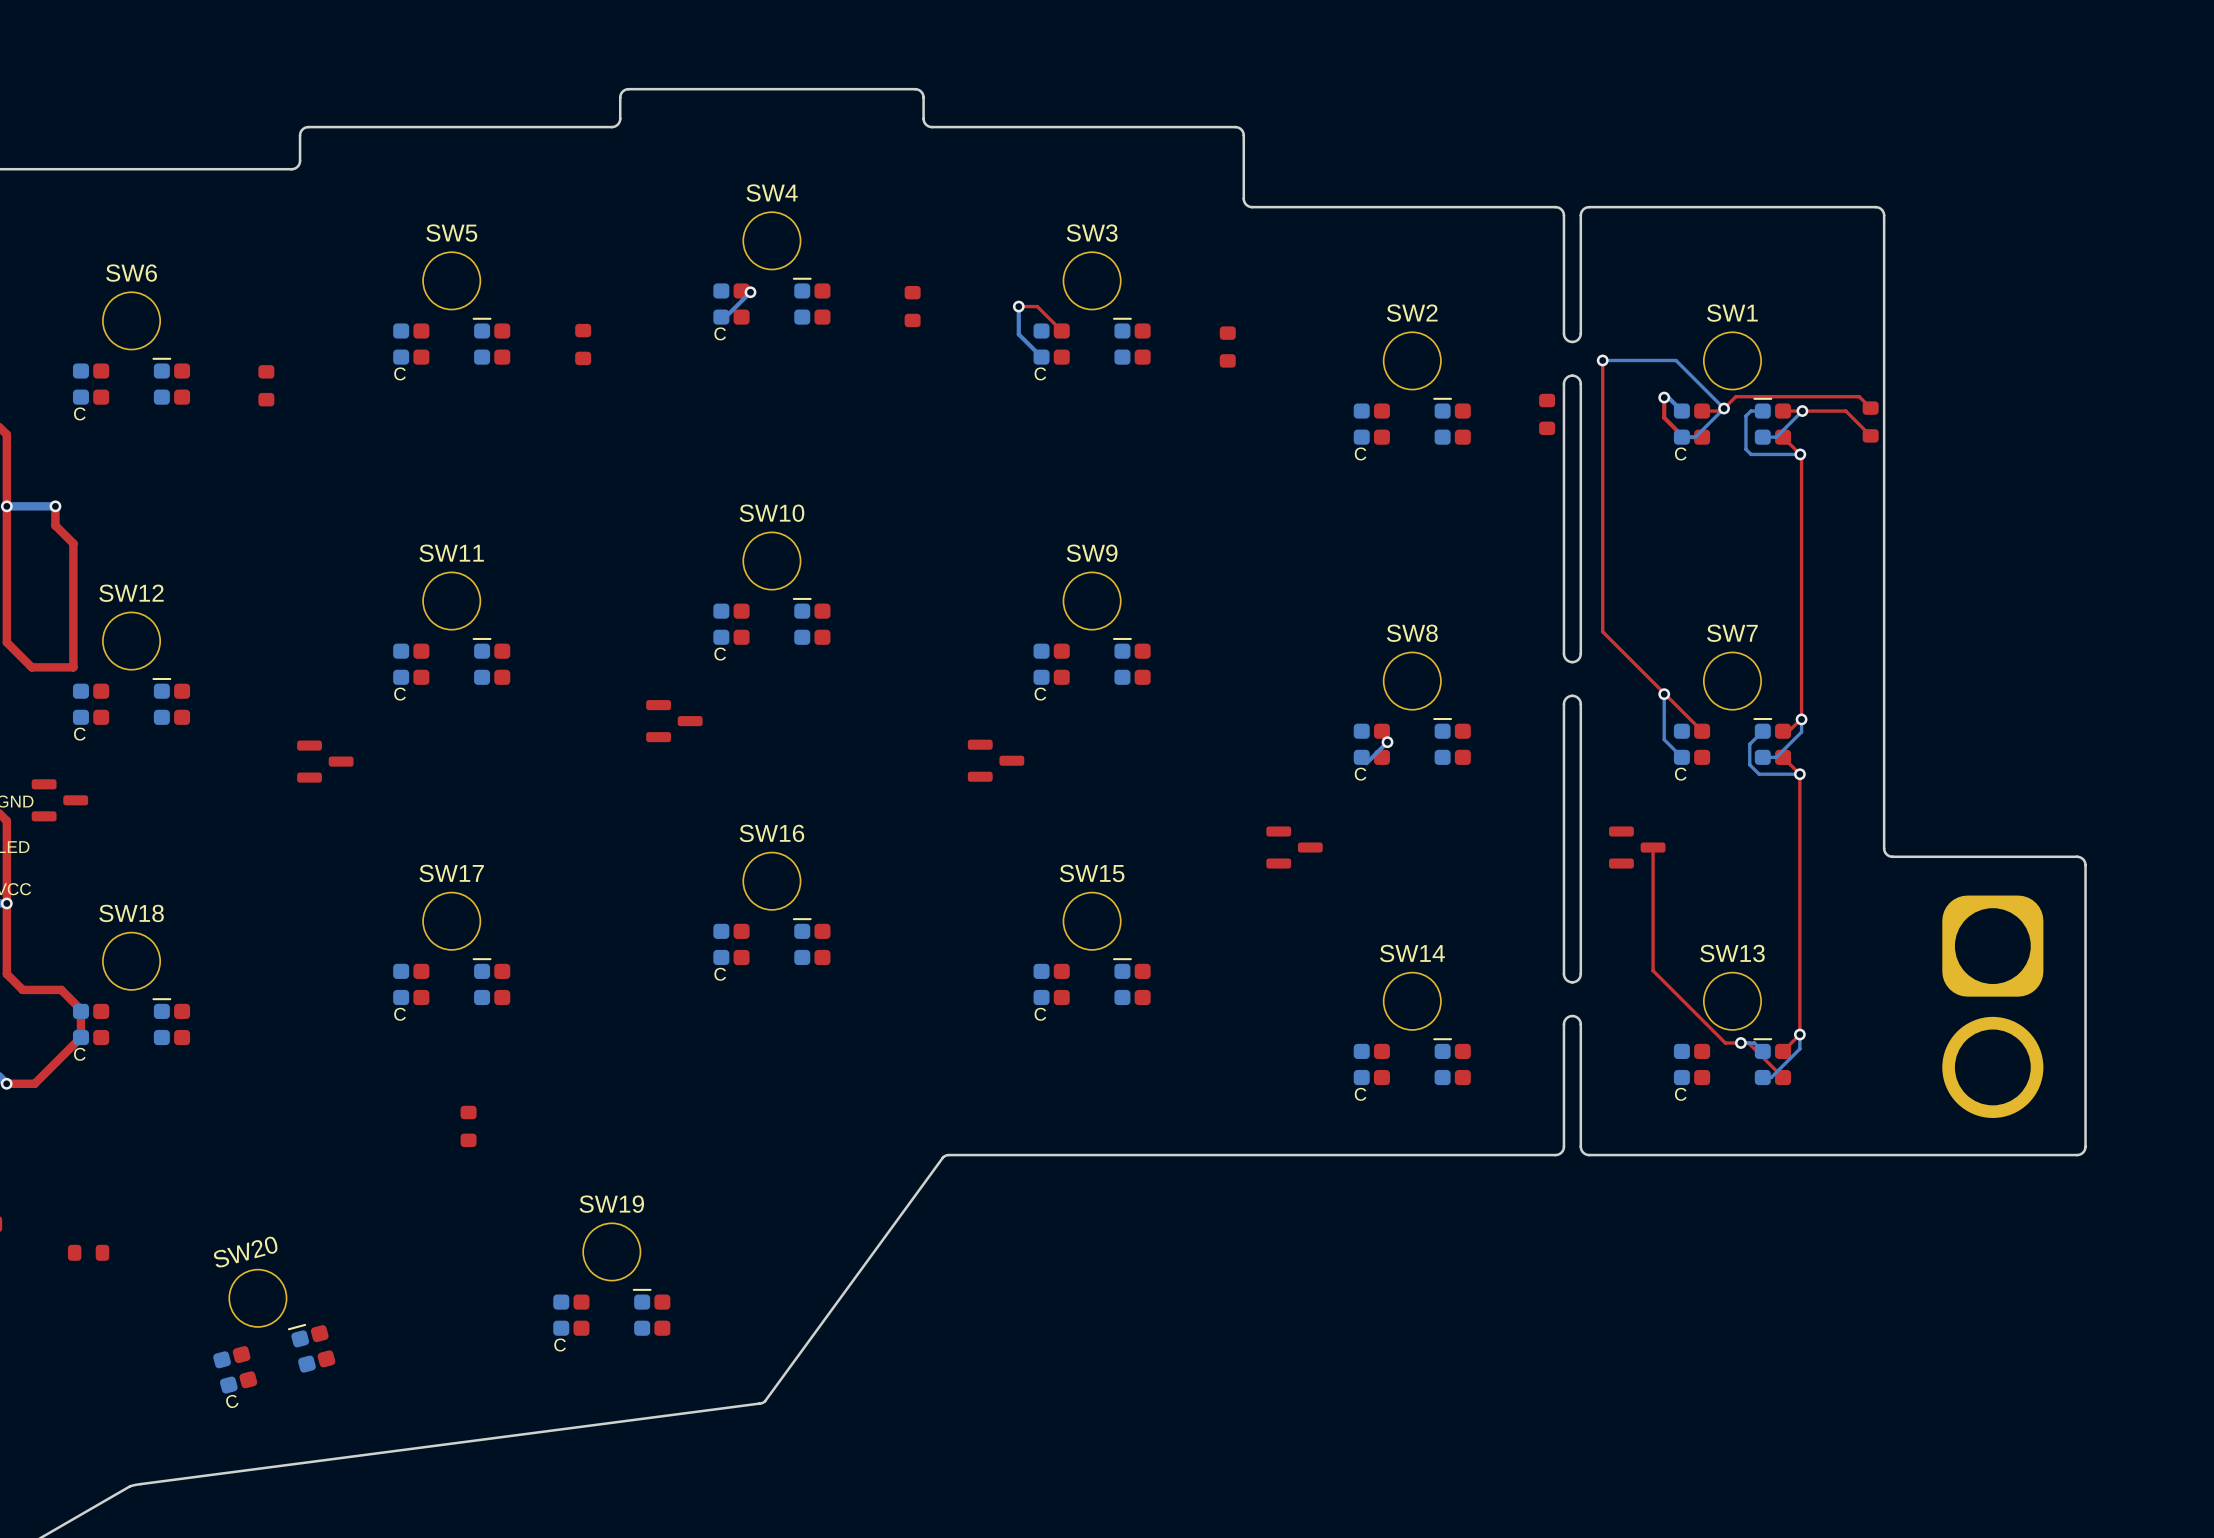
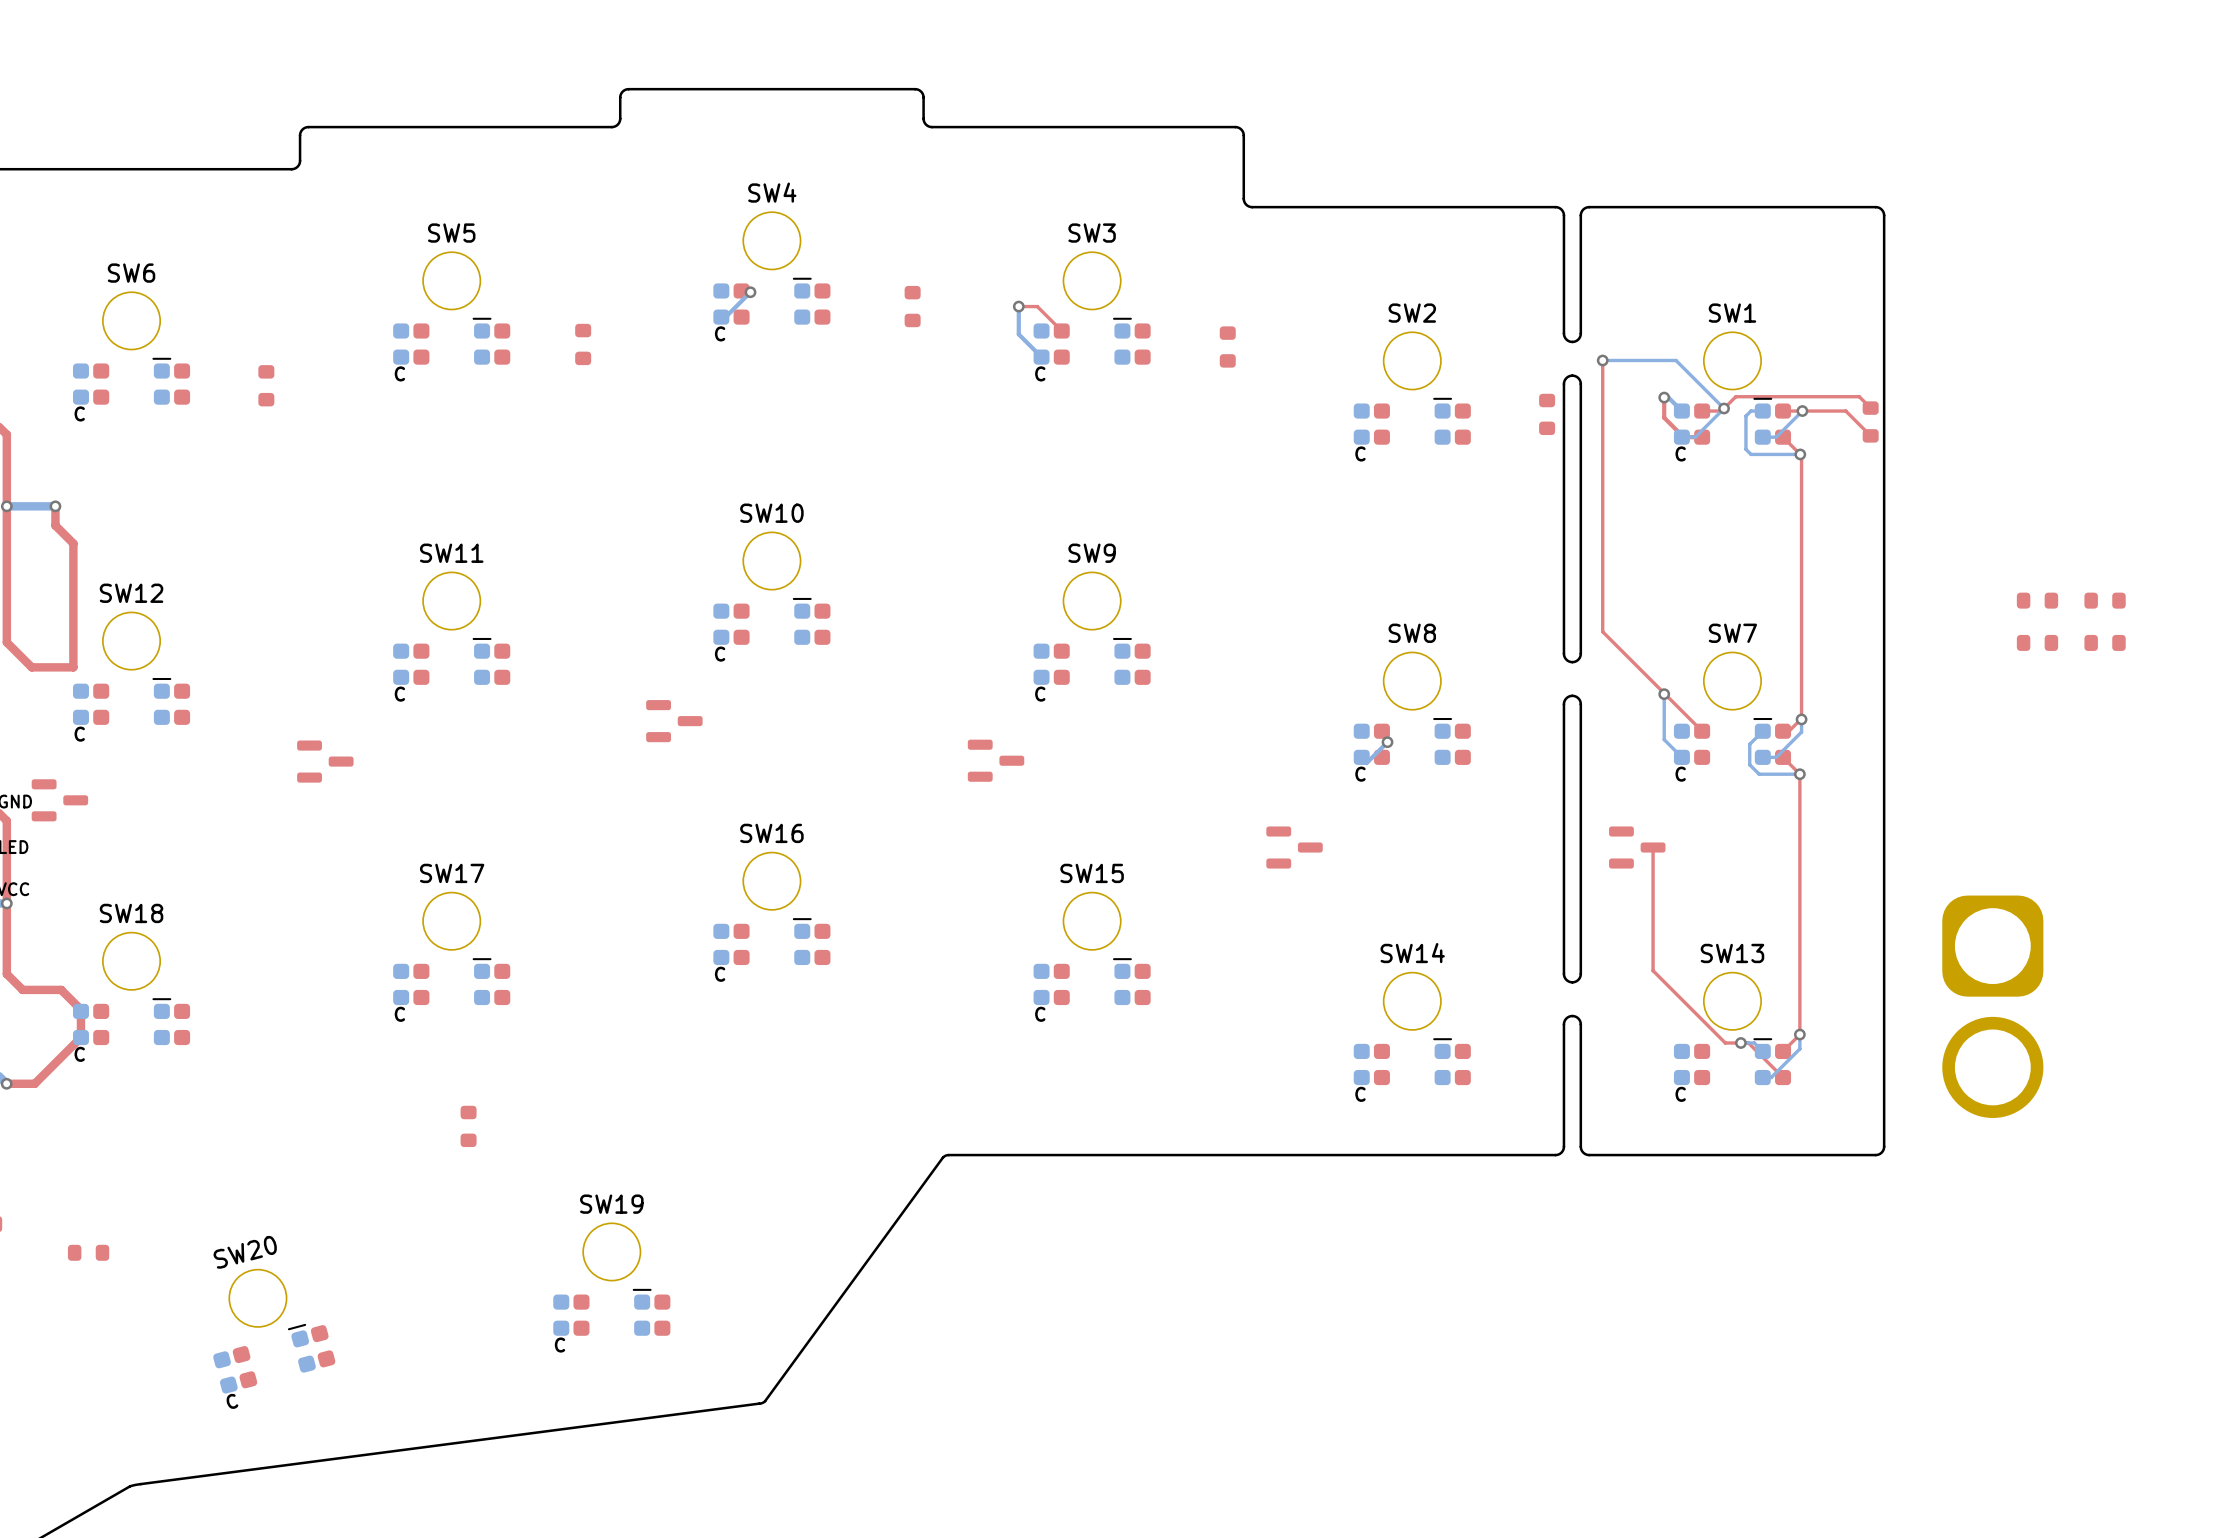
part: none -> (2037, 600)
part: none -> (2105, 600)
part: none -> (2037, 642)
part: none -> (2105, 642)
board edge: (1884, 848) (1886, 854) (1892, 856) (2077, 856) (2083, 860) (2085, 865) (2085, 1146) (2083, 1152) (2077, 1155) (1875, 1155) -> (1884, 848) (1884, 1146) (1881, 1152) (1875, 1155)

